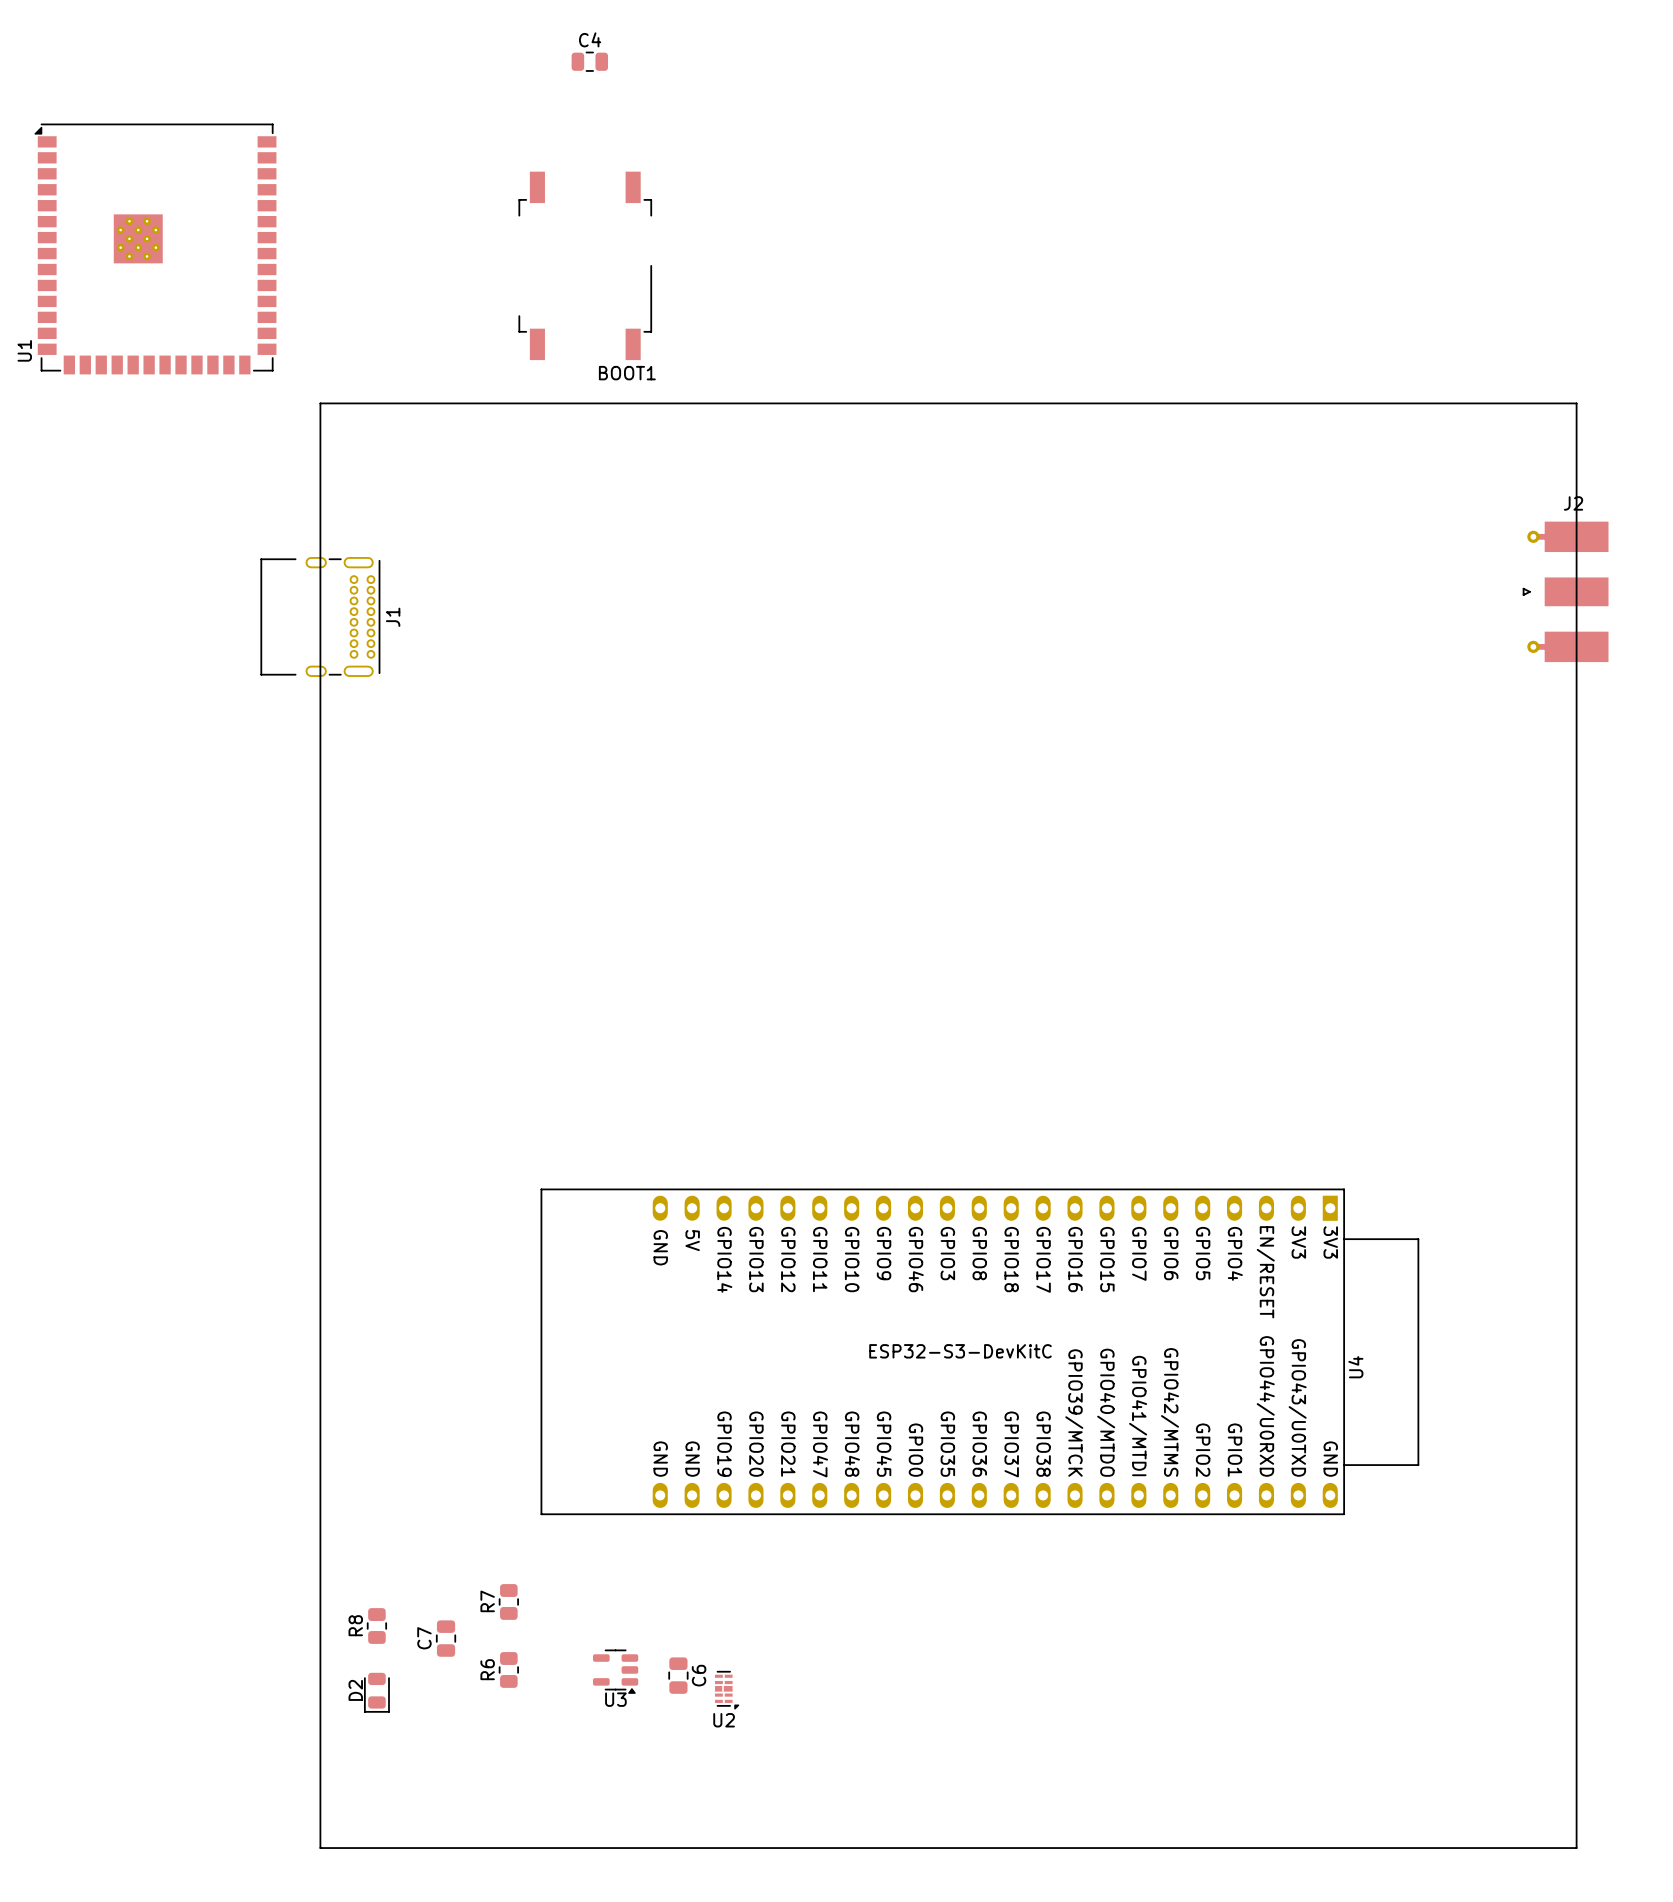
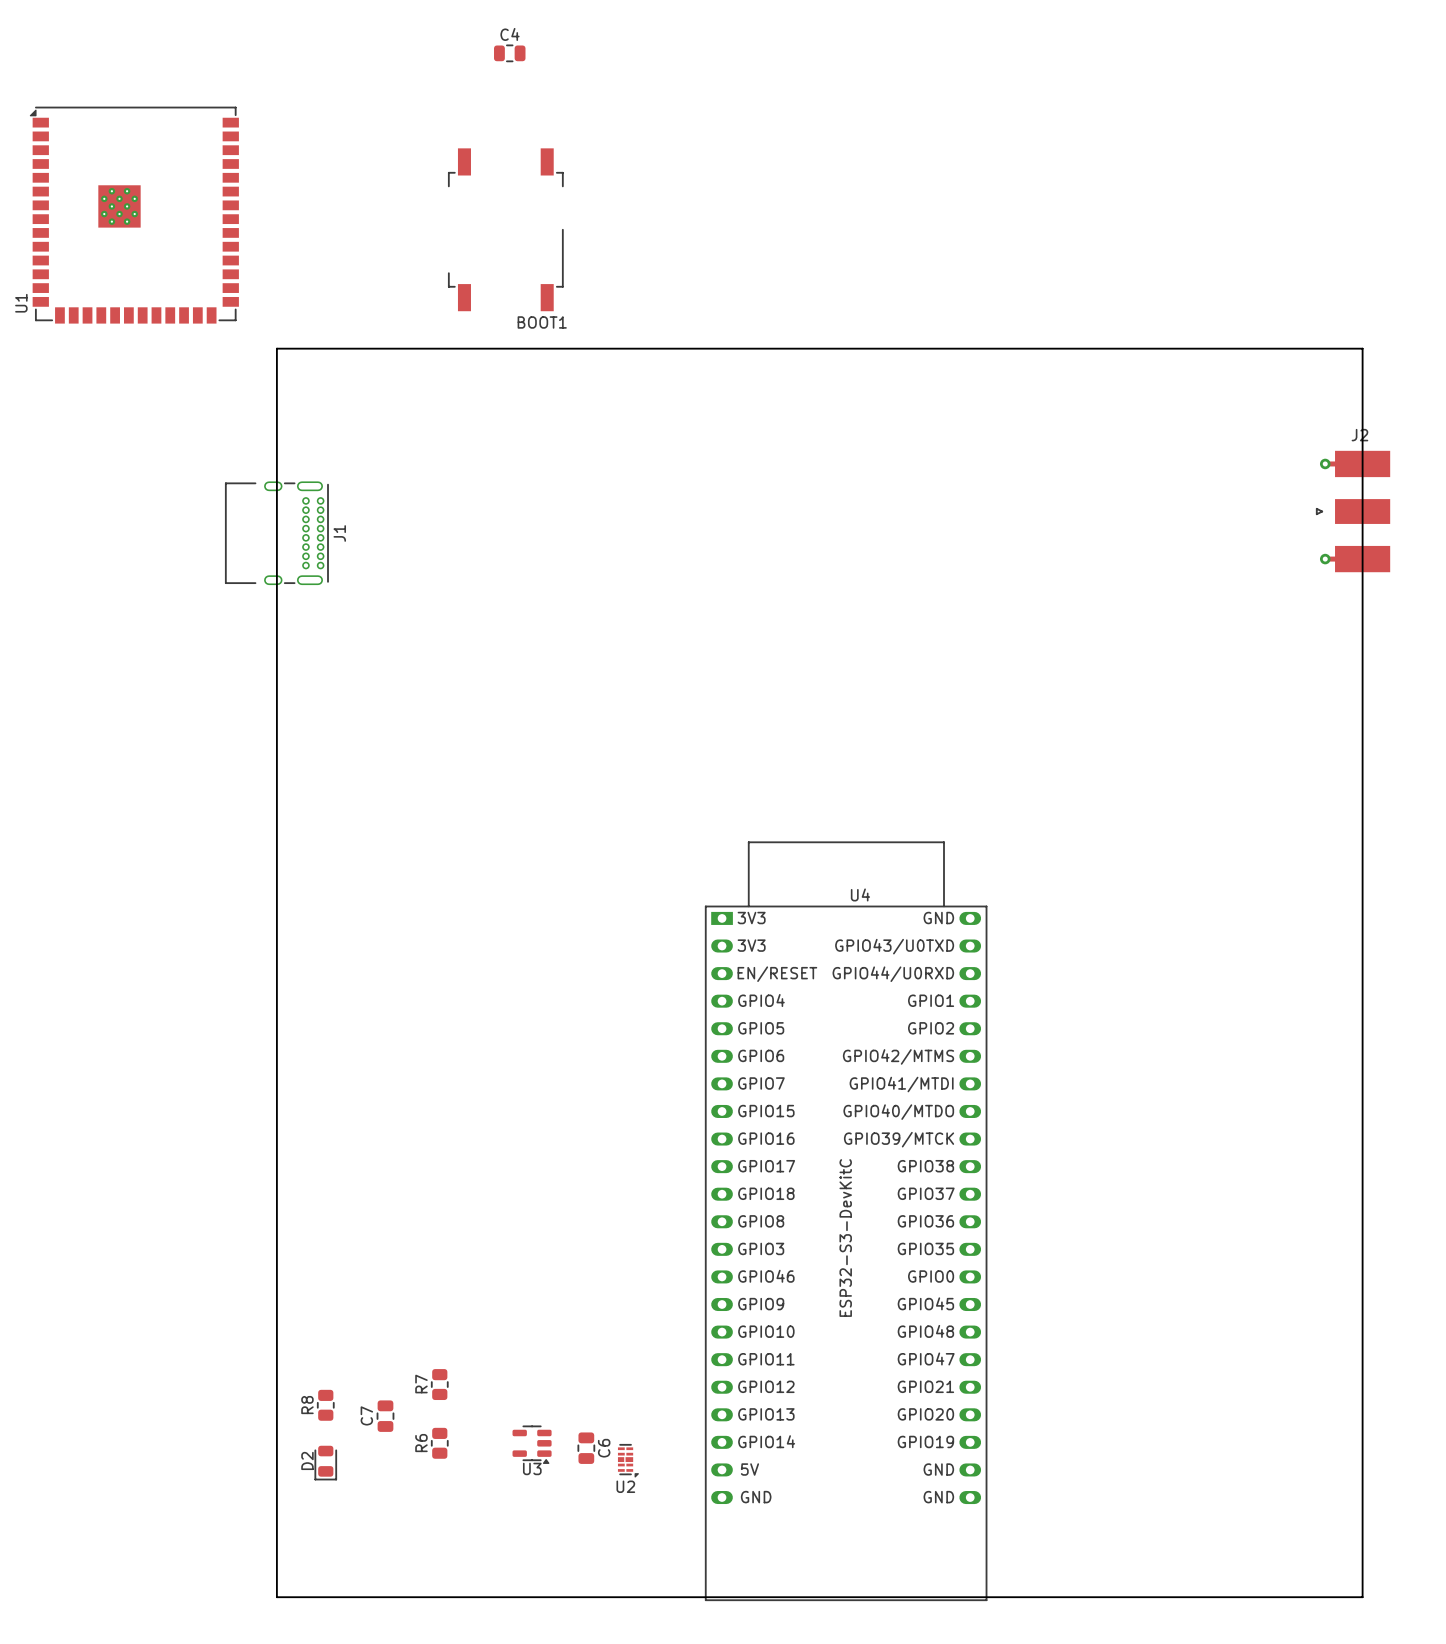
U4 rotation: 0° (979, 1351) -> 90° counterclockwise (846, 1221)

